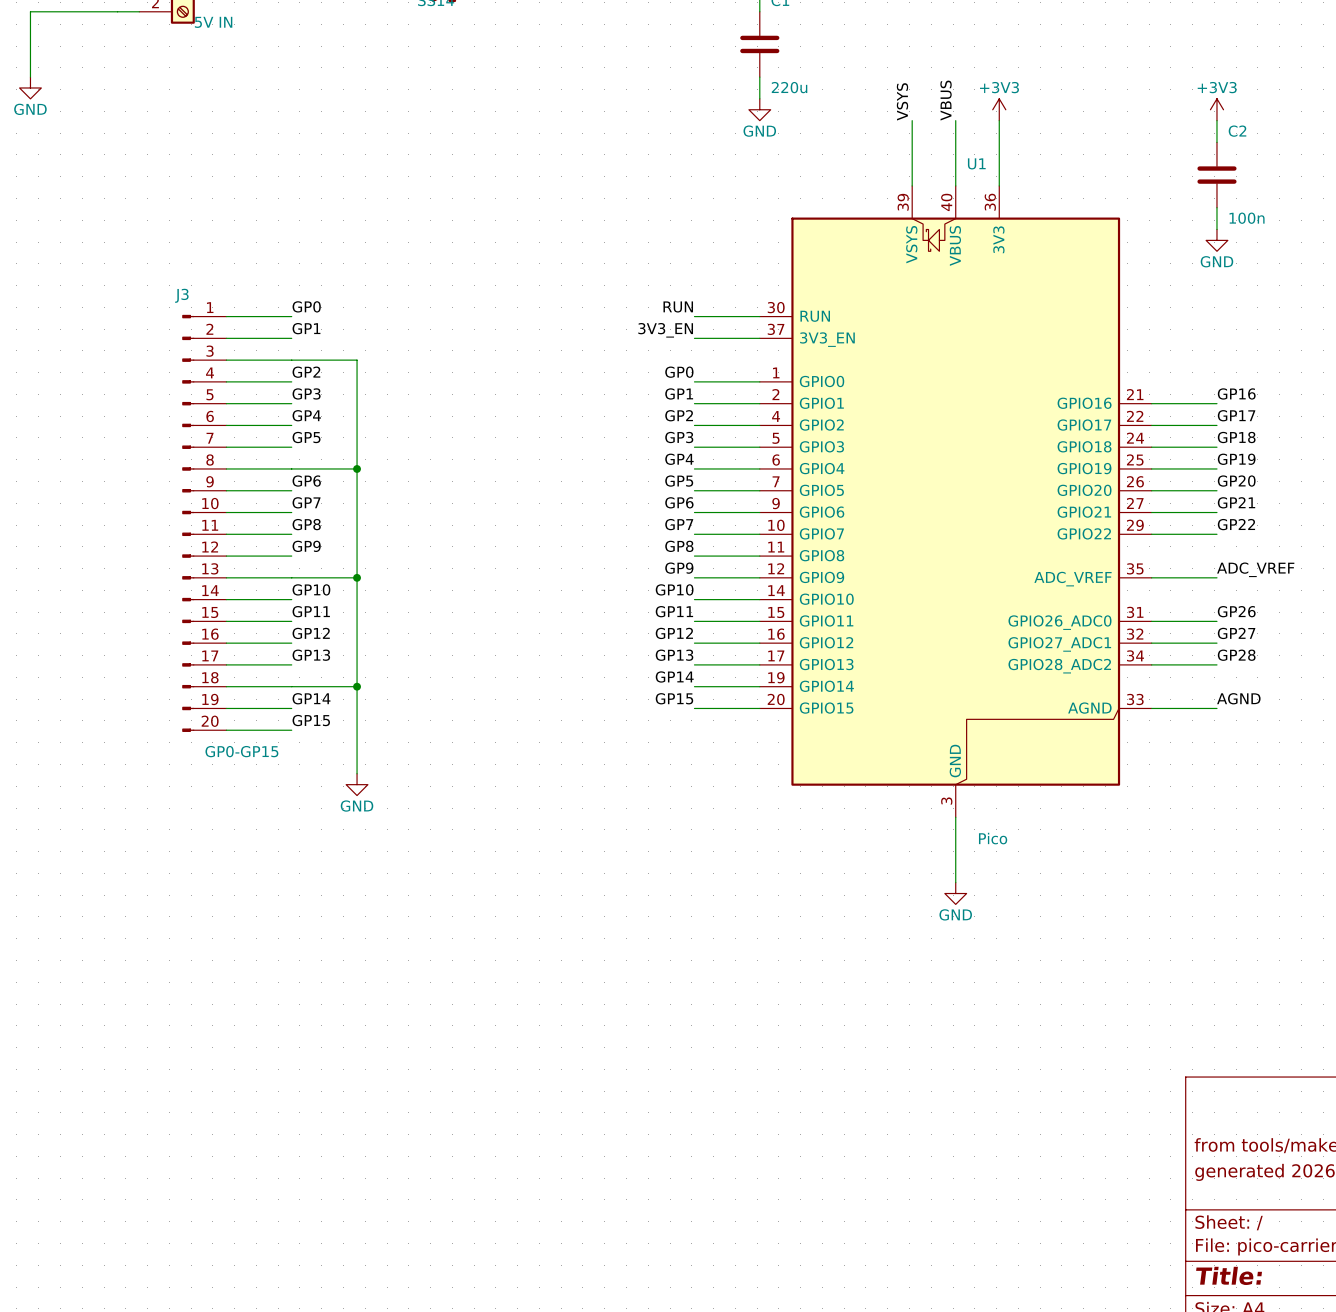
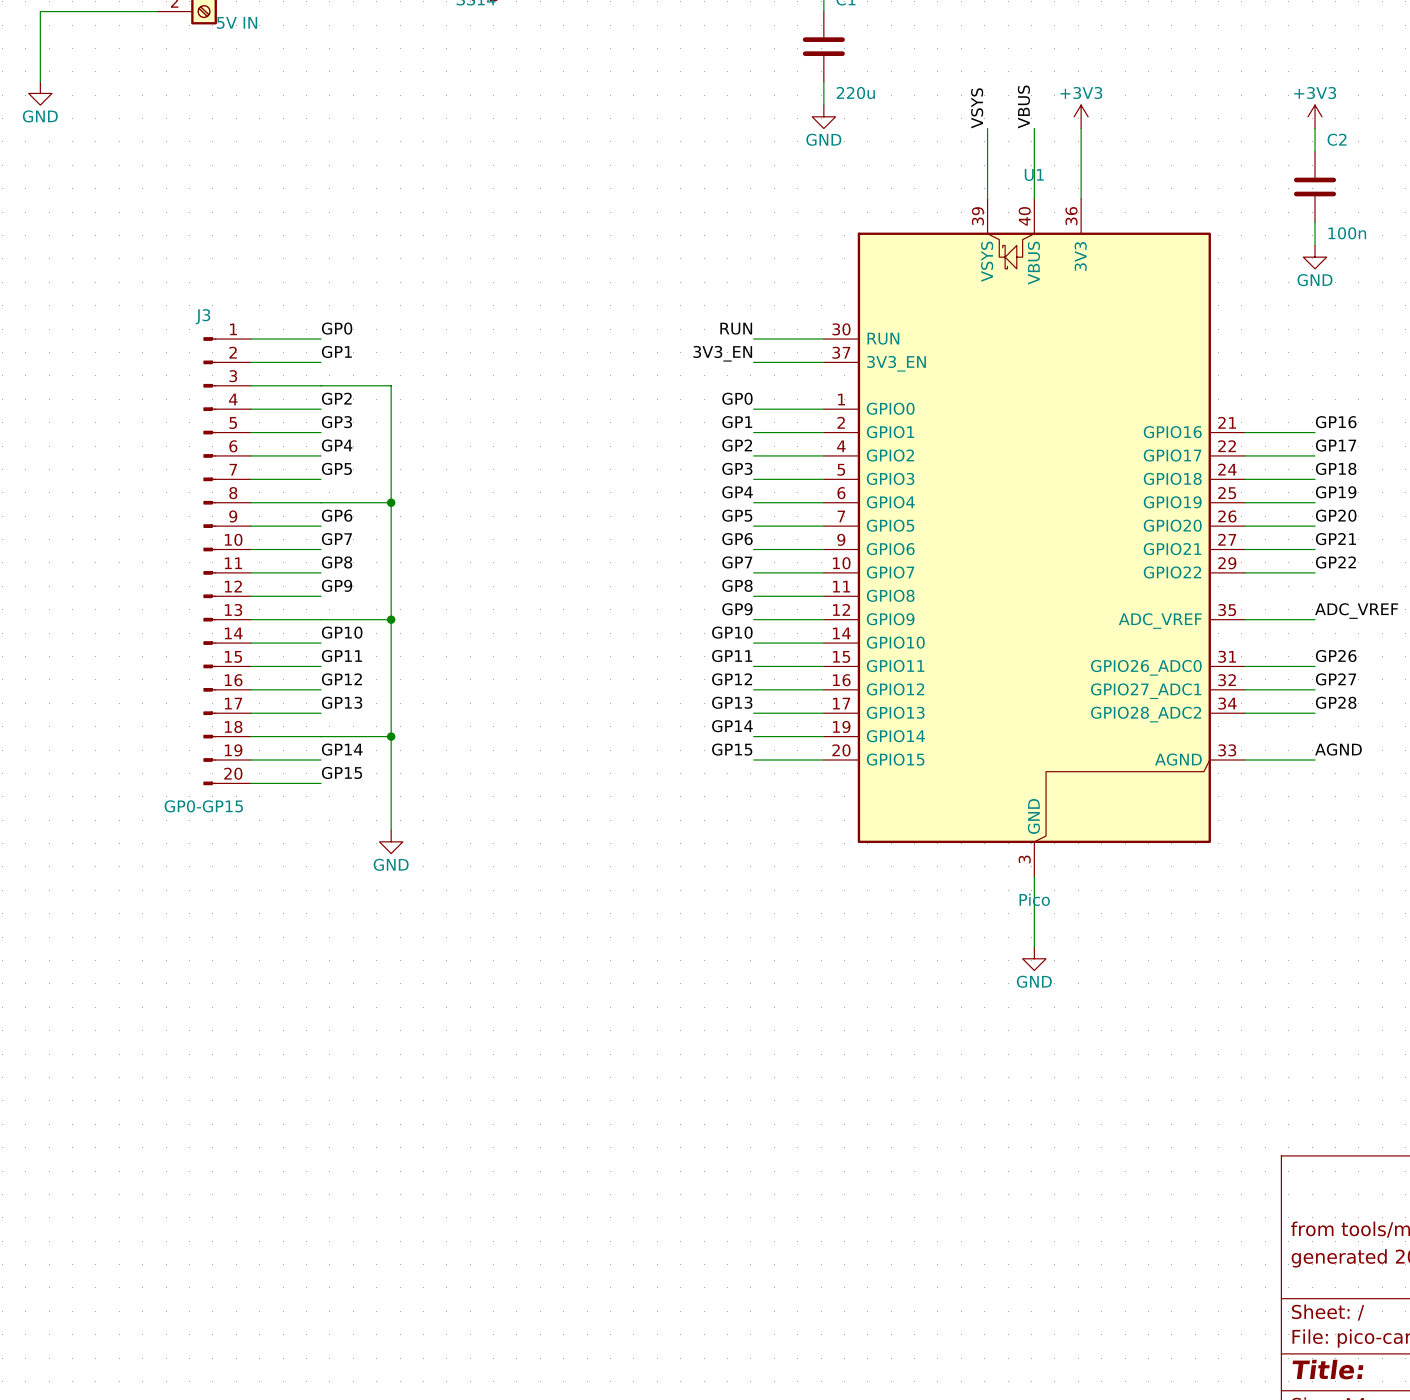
U1 name position: U1 (976, 163) -> U1 (1034, 174)
J3 value position: GP0-GP15 (241, 751) -> GP0-GP15 (203, 806)
U1 value position: Pico (993, 838) -> Pico (1034, 899)

